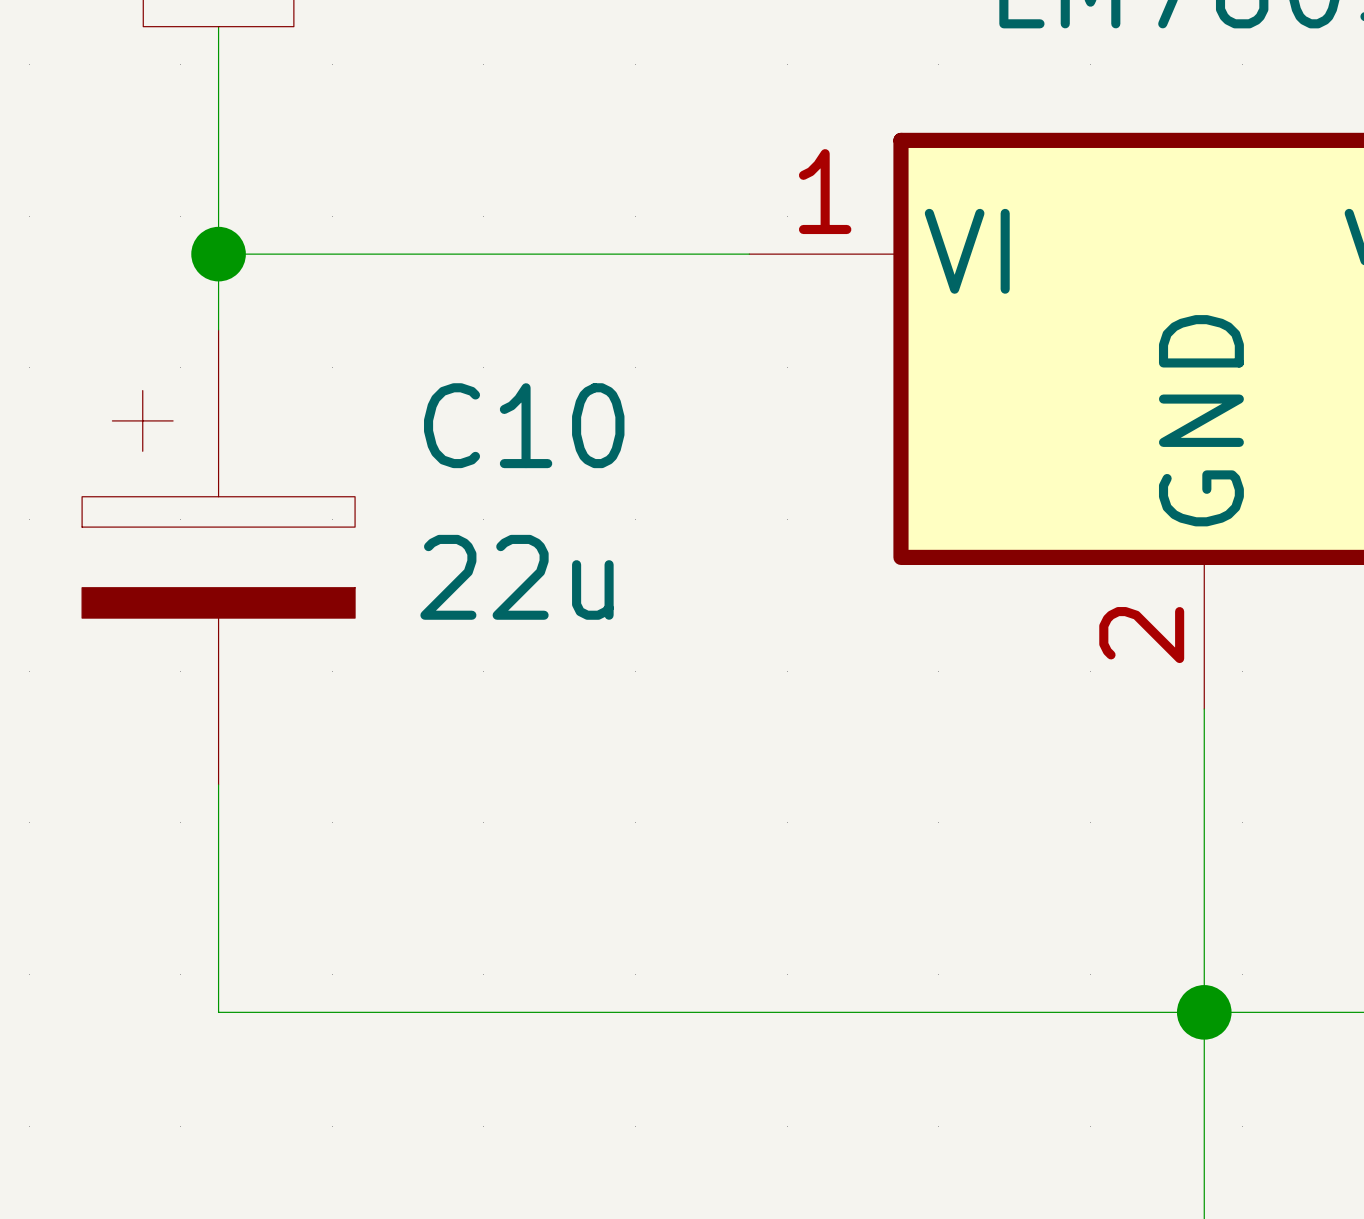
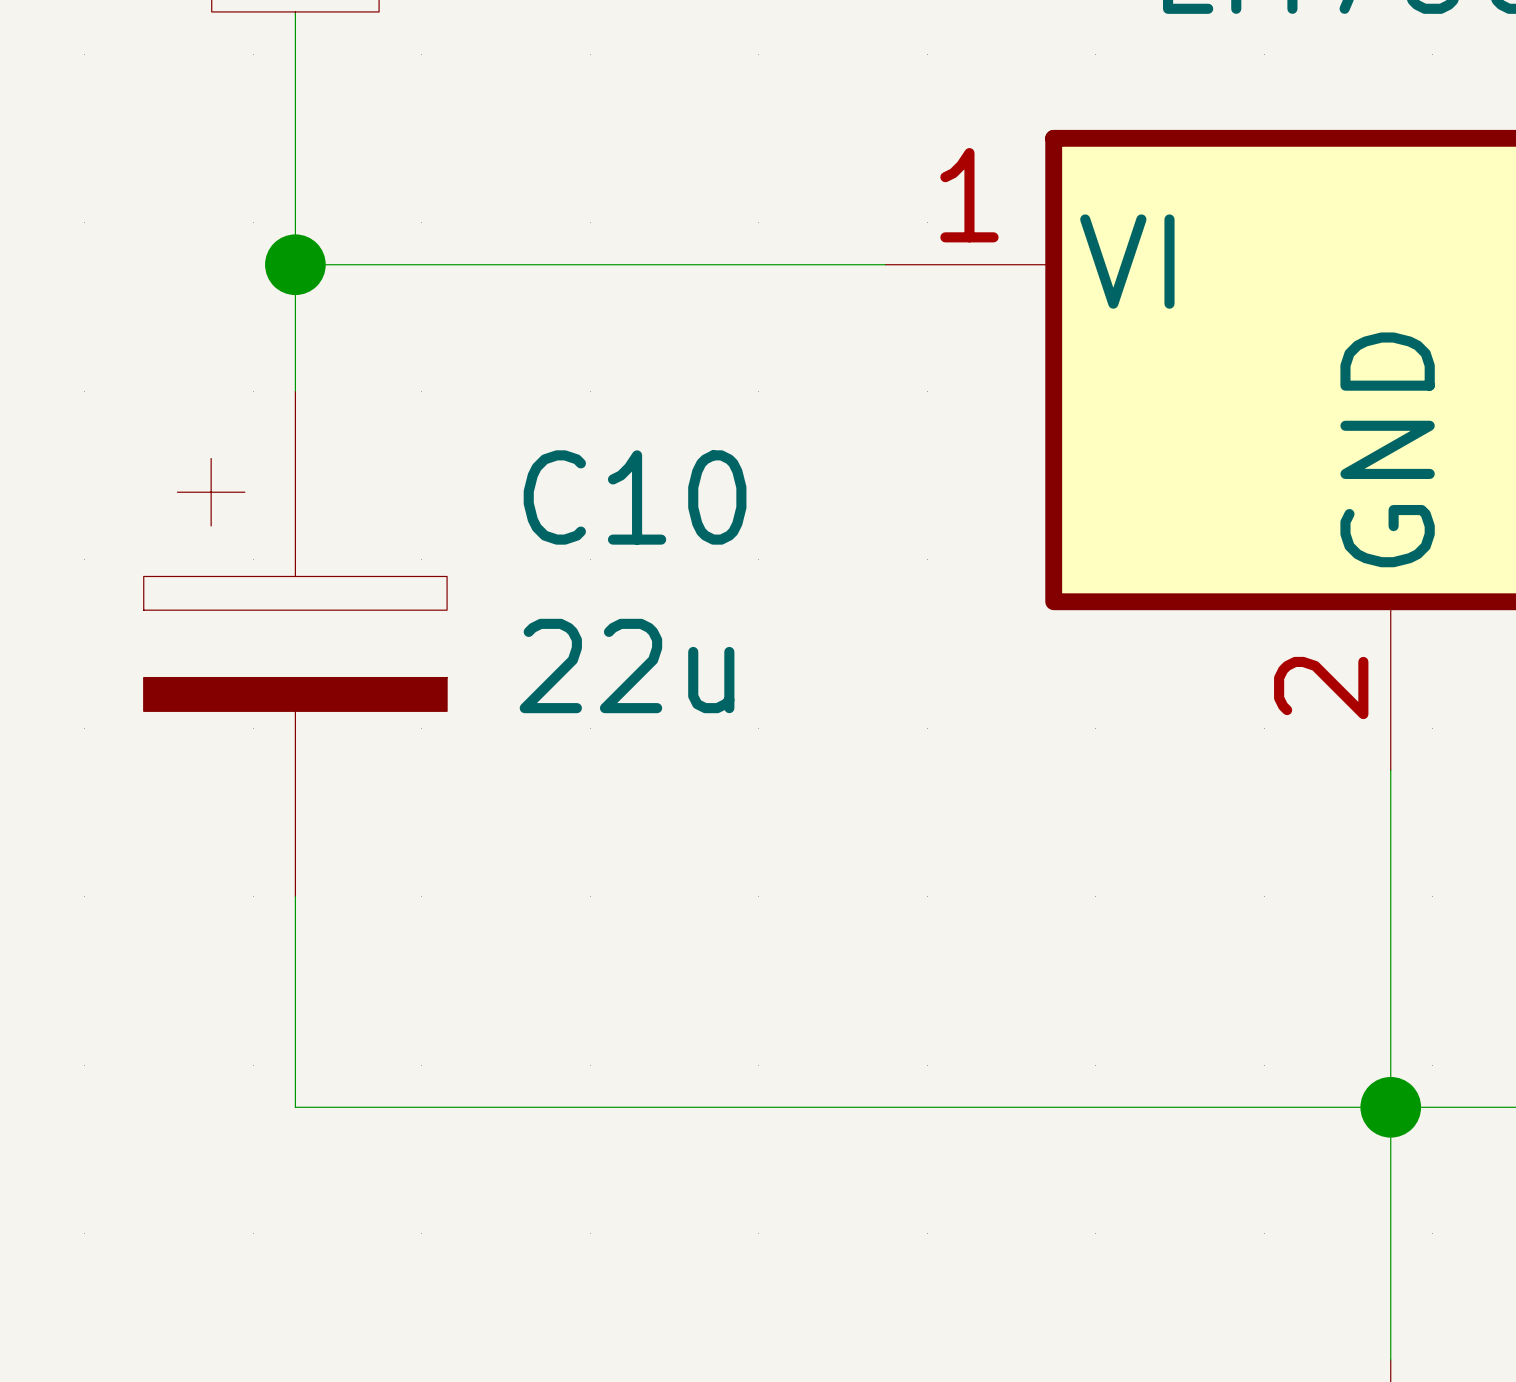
C10 position: (218, 557) -> (295, 643)

